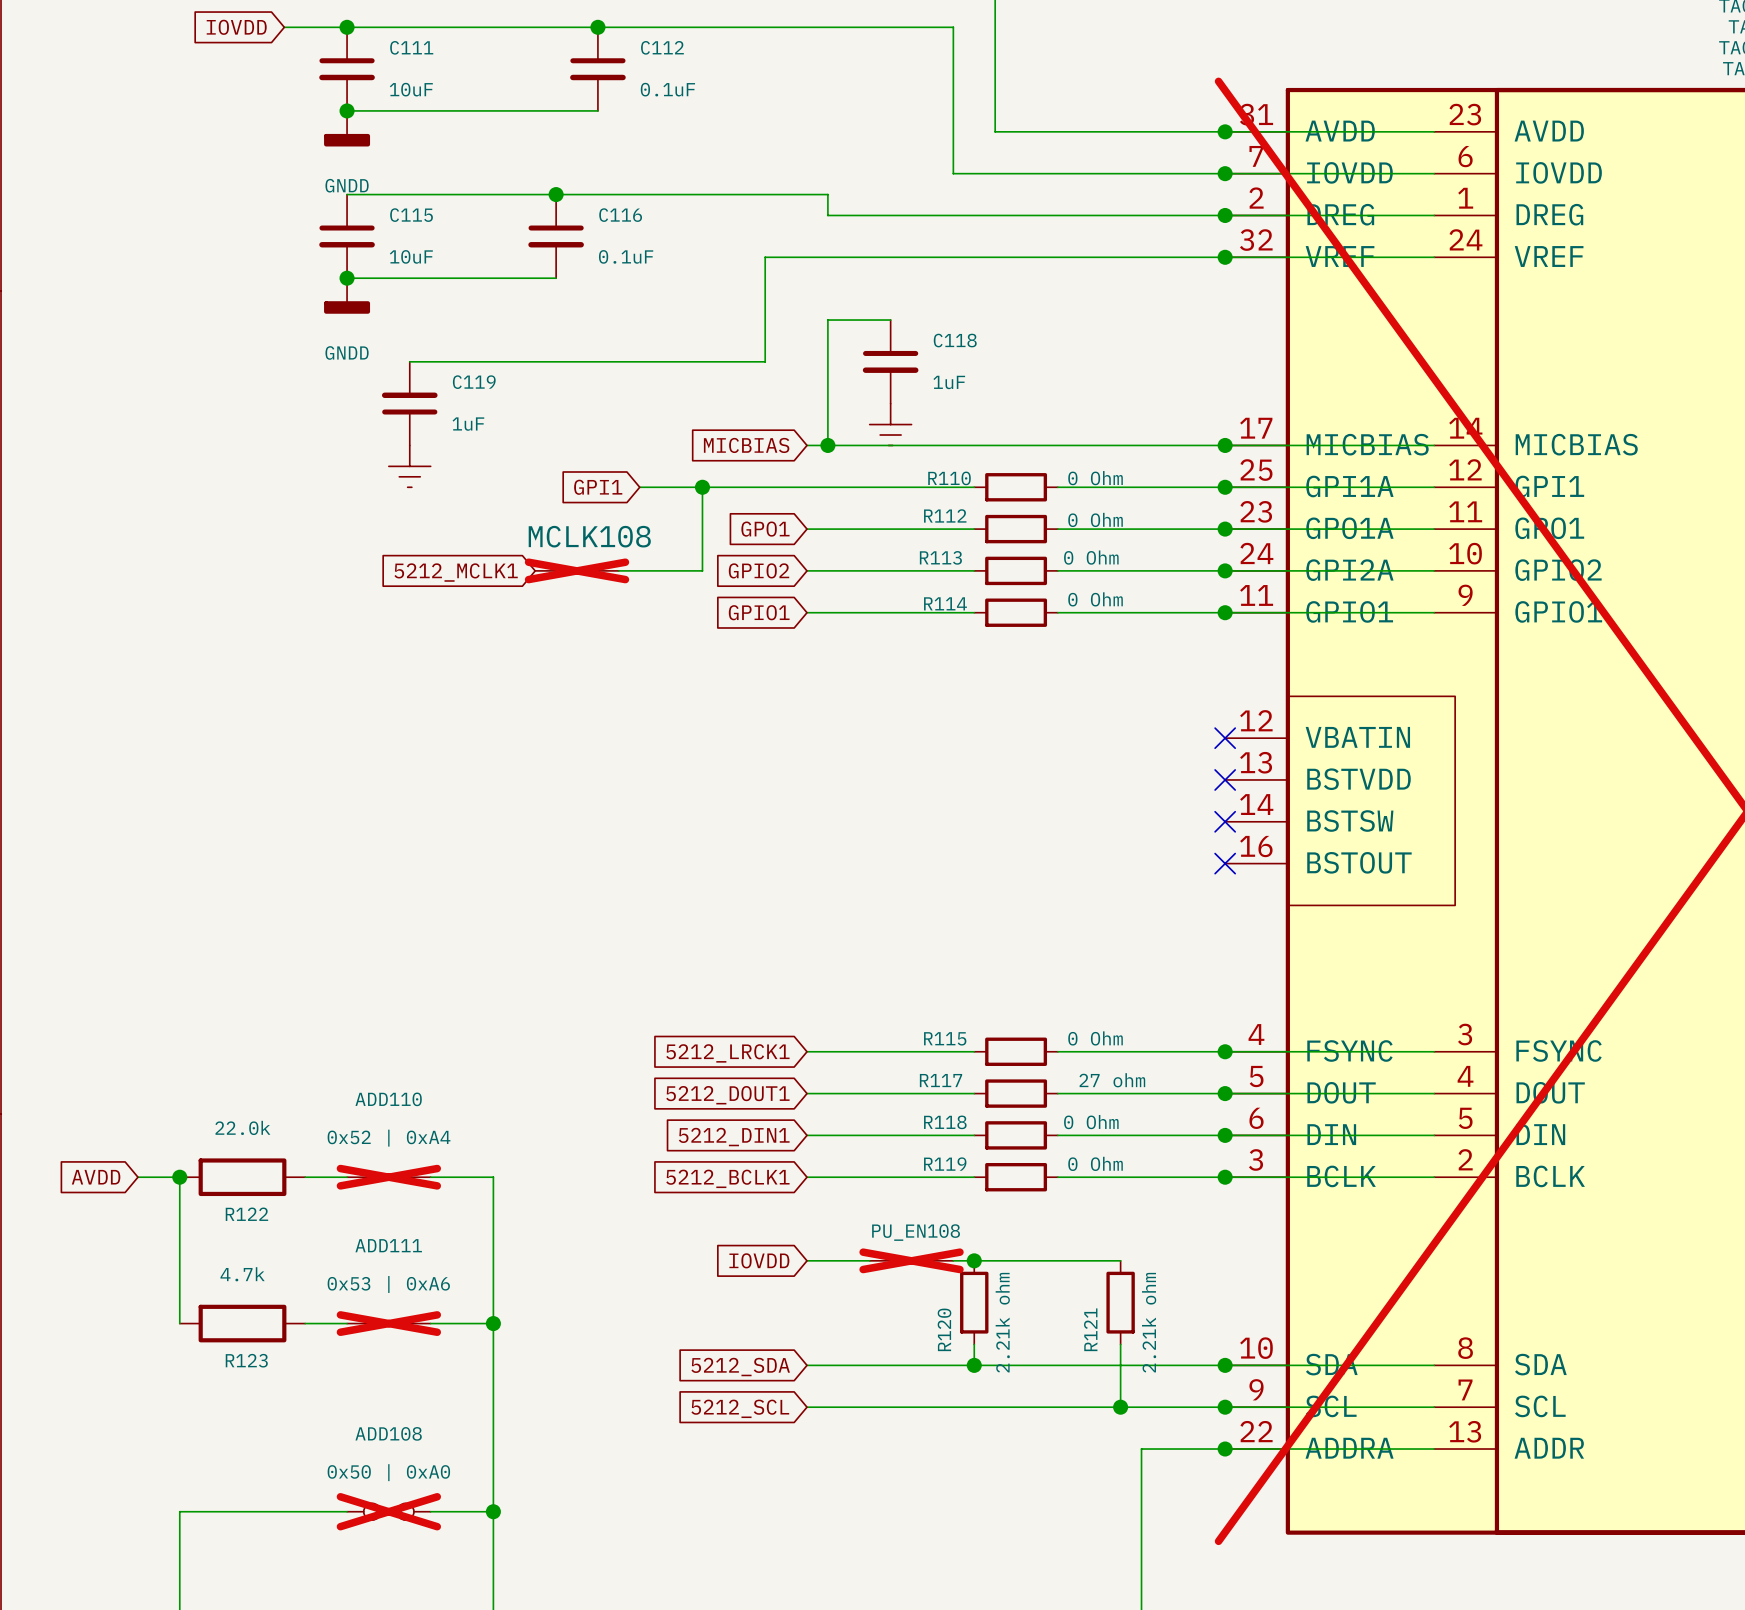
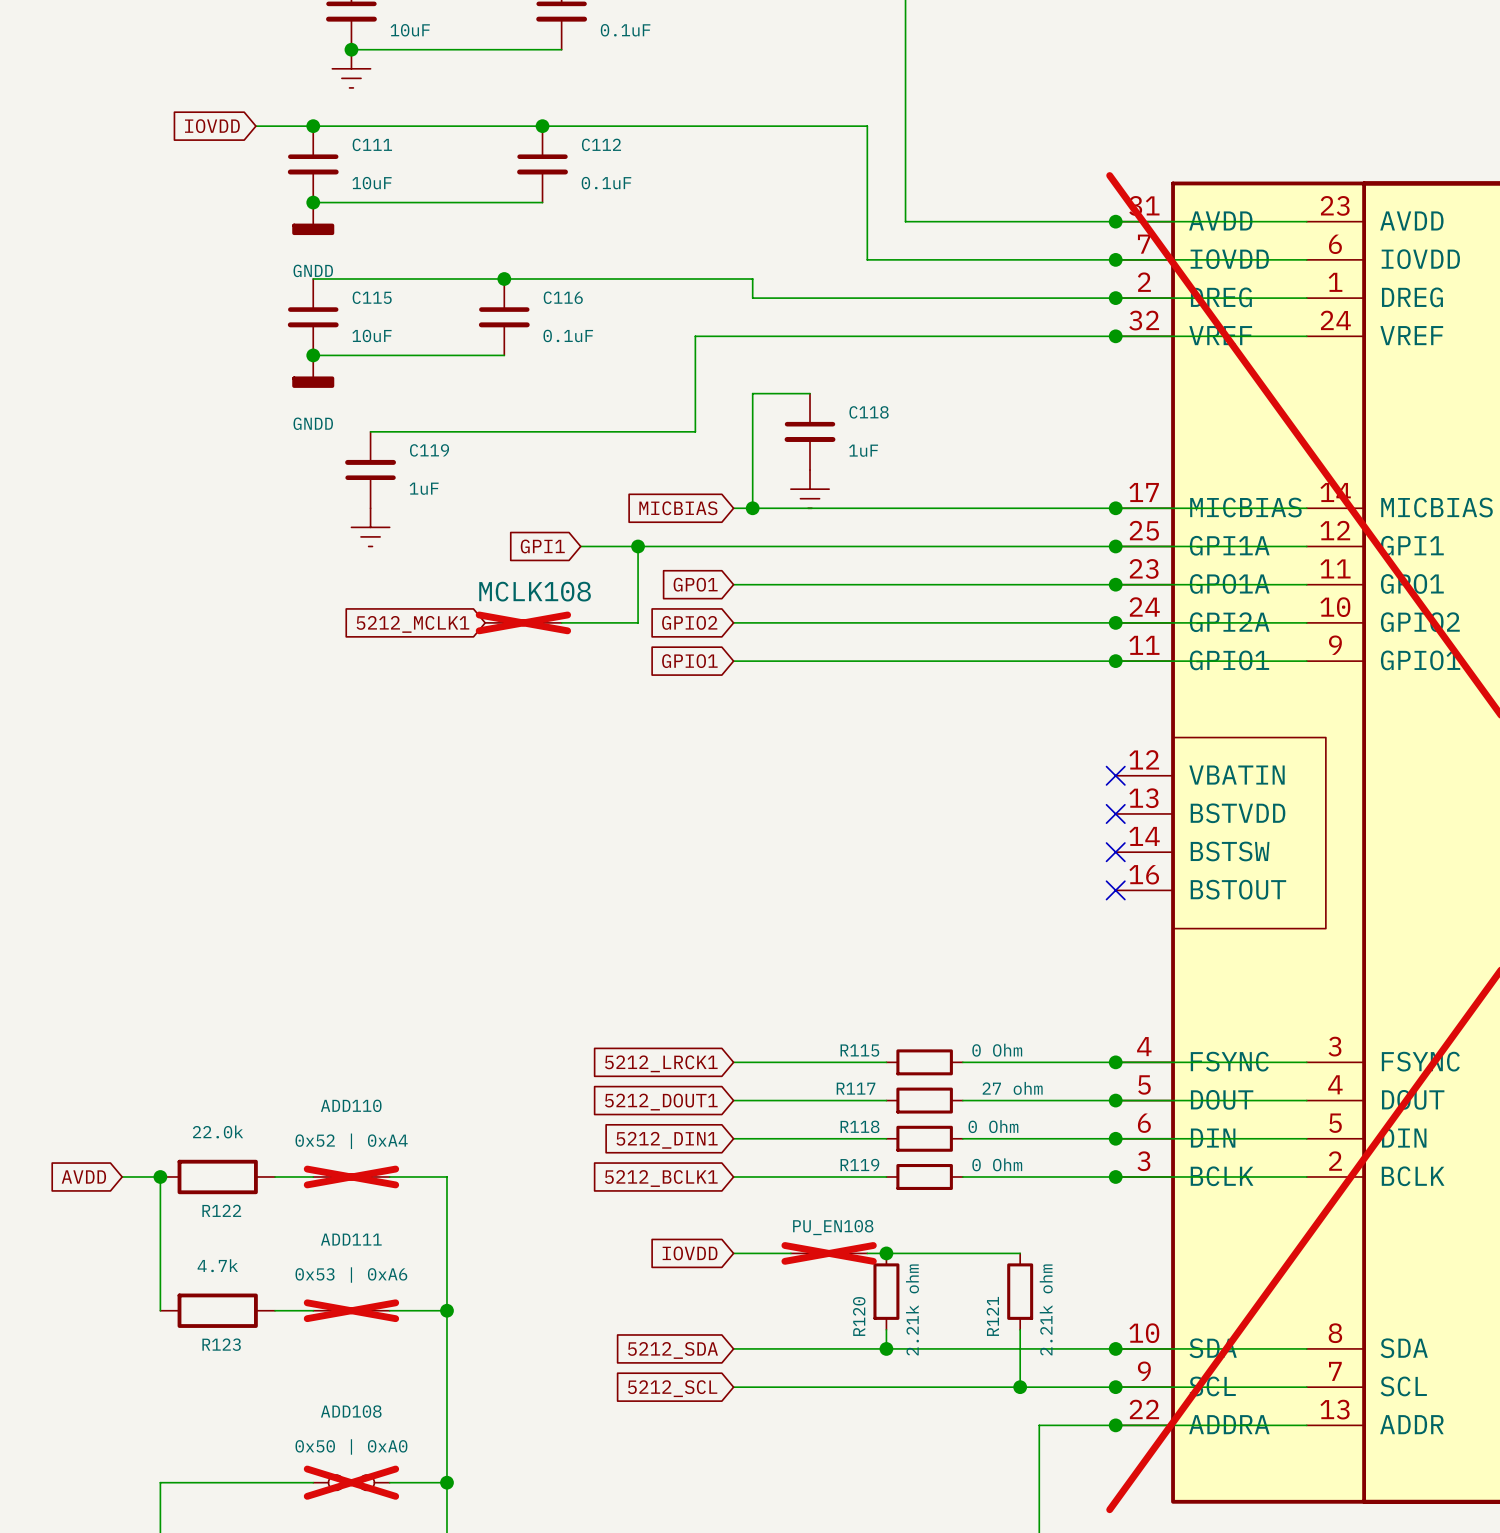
wire: none -> (886, 546) (962, 546)
R110: 0 Ohm (1016, 487) -> none
wire: none -> (886, 584) (962, 584)
R112: 0 Ohm (1016, 529) -> none
wire: none -> (886, 622) (962, 622)
R113: 0 Ohm (1016, 570) -> none
wire: none -> (886, 661) (962, 661)
R114: 0 Ohm (1016, 612) -> none

